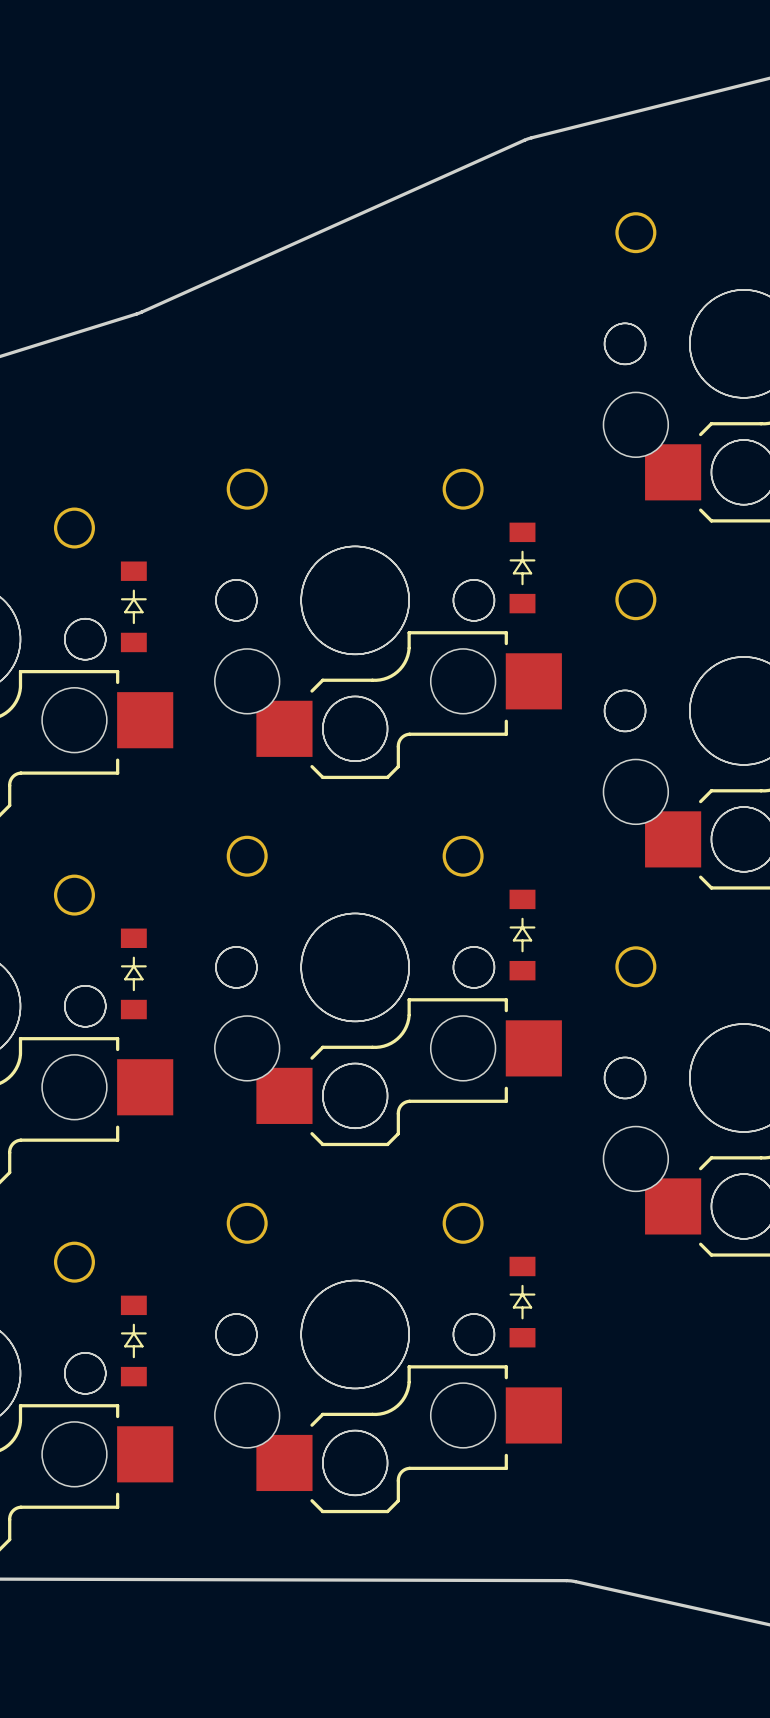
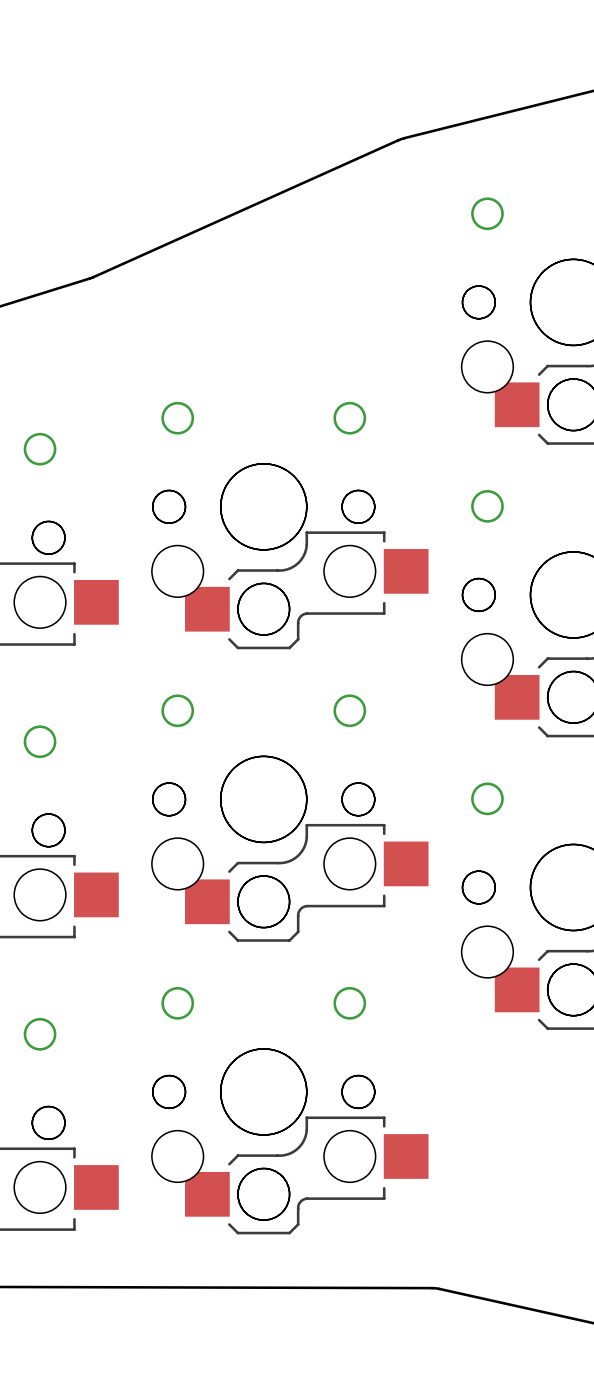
part: (522, 567) -> none
part: (133, 606) -> none
part: (522, 935) -> none
part: (133, 973) -> none
part: (522, 1302) -> none
part: (133, 1340) -> none

